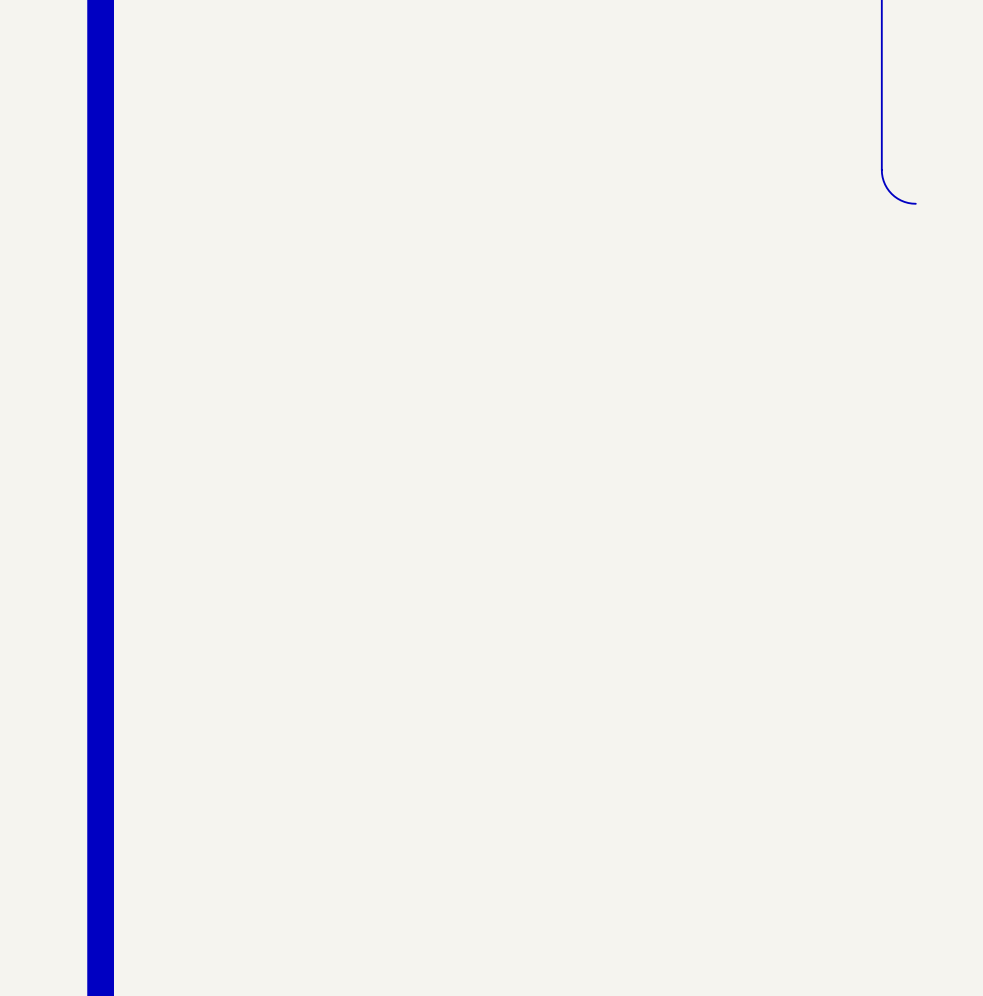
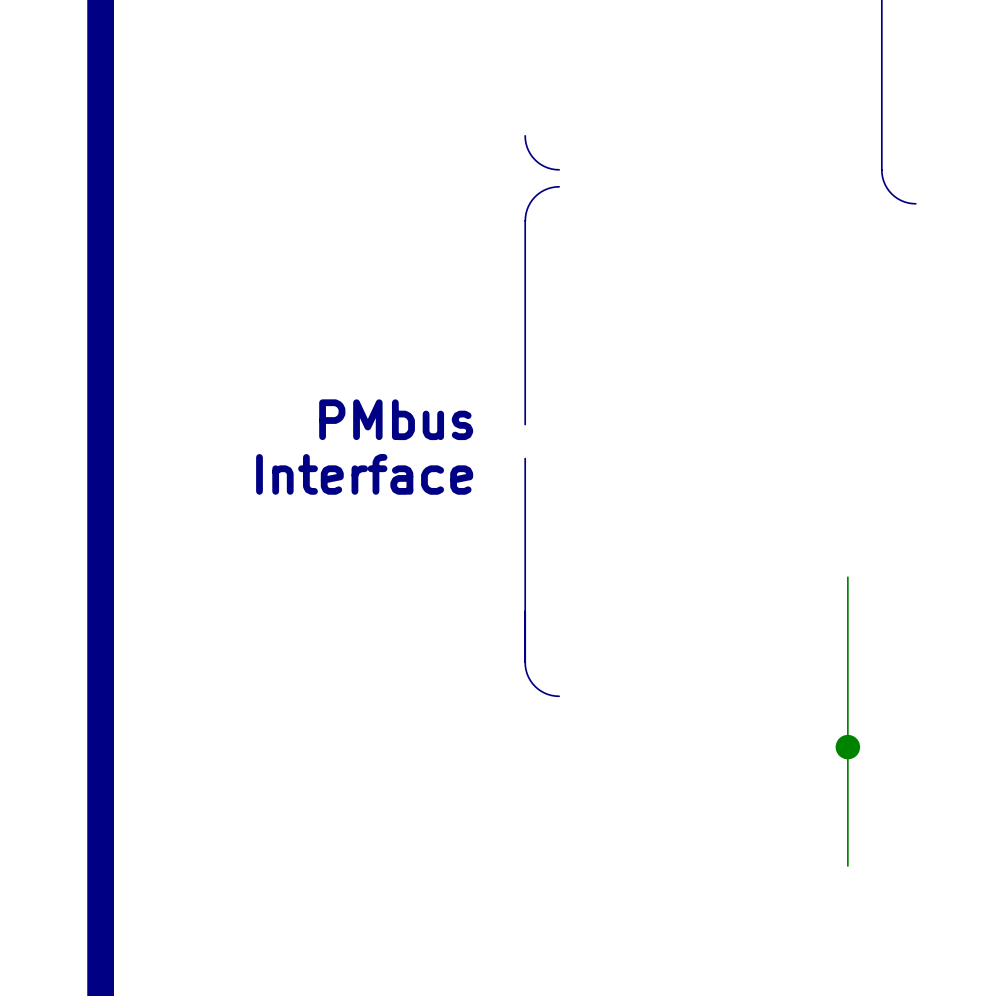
line: none -> (525, 135) (528, 150) (535, 159) (547, 167) (559, 169)
line: none -> (559, 186) (547, 188) (538, 194) (530, 202) (525, 216) (525, 424)
text: none -> PMbus (396, 419)
line: none -> (525, 458) (525, 666) (528, 677) (535, 686) (544, 692) (559, 696)
text: none -> Interface (364, 474)
wire: none -> (847, 577) (847, 865)
junction: none -> (847, 747)

